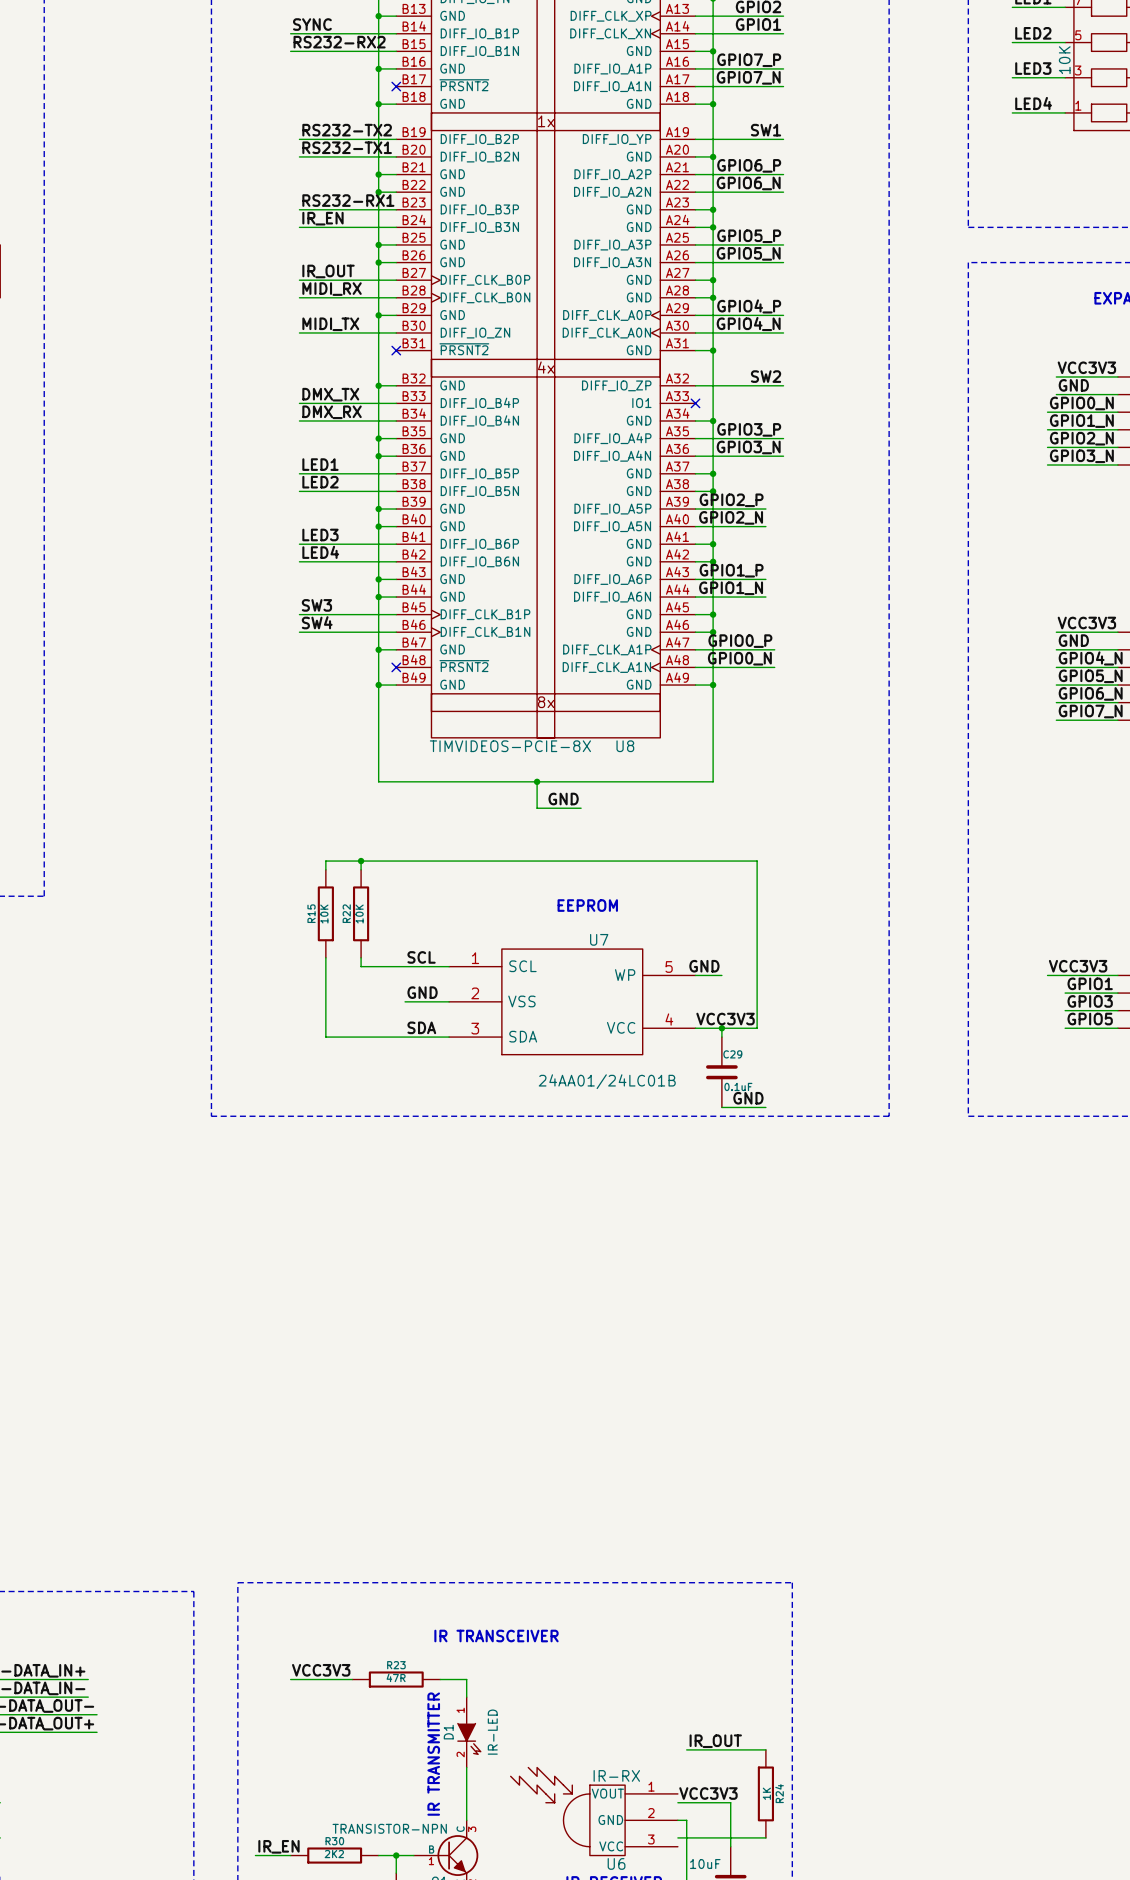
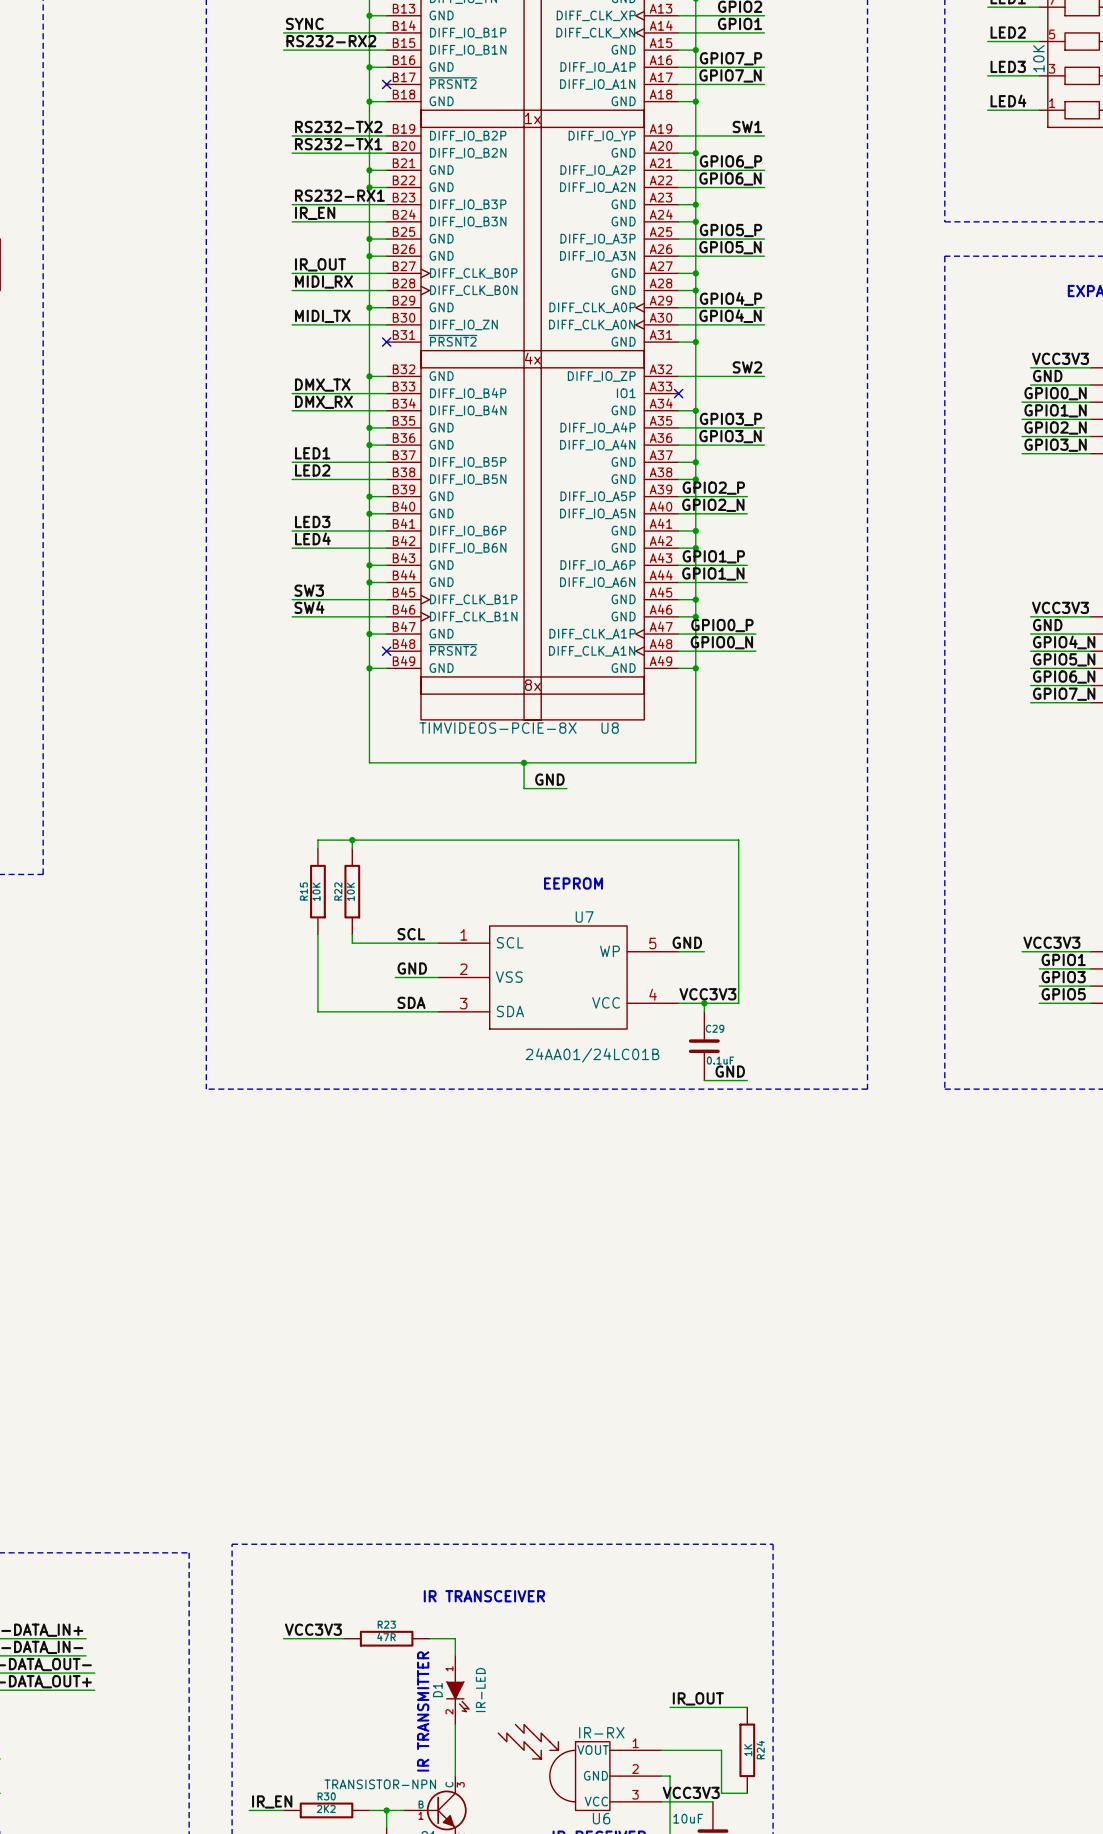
label position: VCC3V3 (708, 1793) -> VCC3V3 (691, 1792)
wire: (677, 1802) (730, 1802) (730, 1846) -> (661, 1801) (712, 1801)
wire: (677, 1837) (739, 1837) -> (661, 1750) (721, 1750) (721, 1793)

